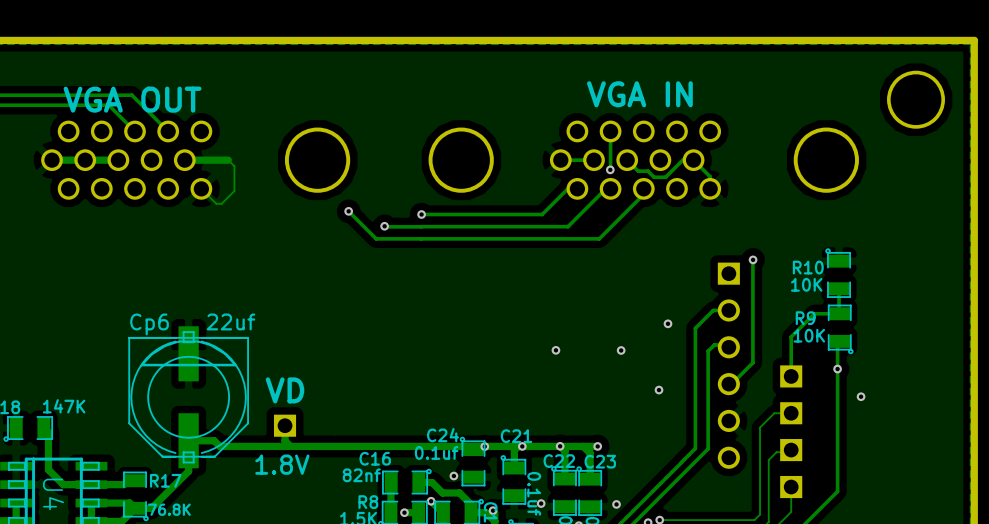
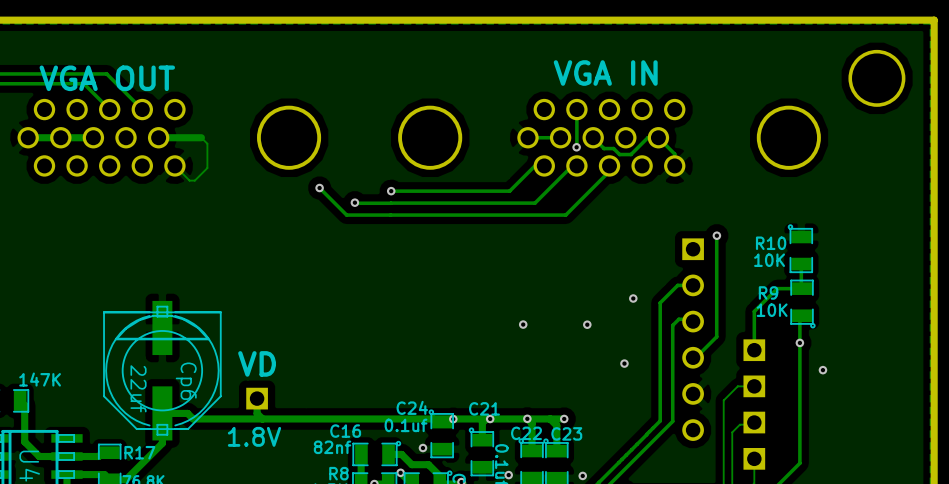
Cp6 value rotation: 0° (231, 321) -> 90° clockwise (138, 388)
Cp6 value position: 22uf (231, 321) -> 22uf (138, 388)
Cp6 name rotation: 0° (149, 324) -> 90° clockwise (186, 381)
Cp6 name position: Cp6 (149, 324) -> Cp6 (186, 381)

